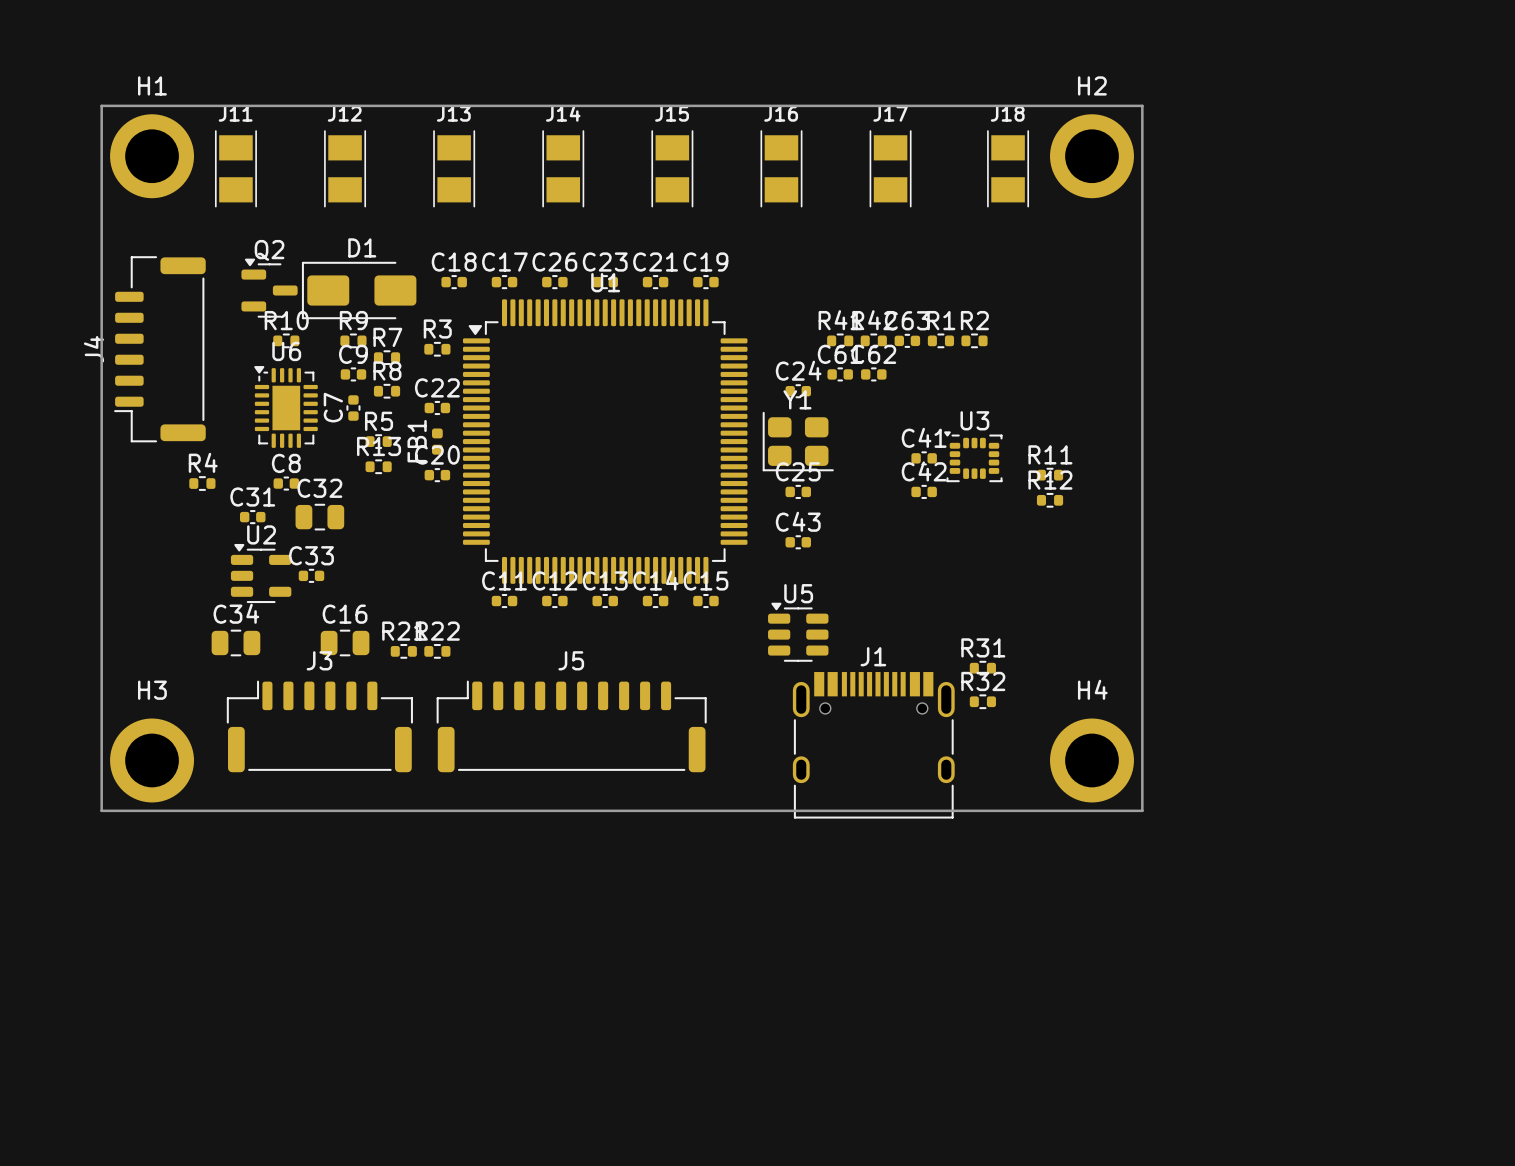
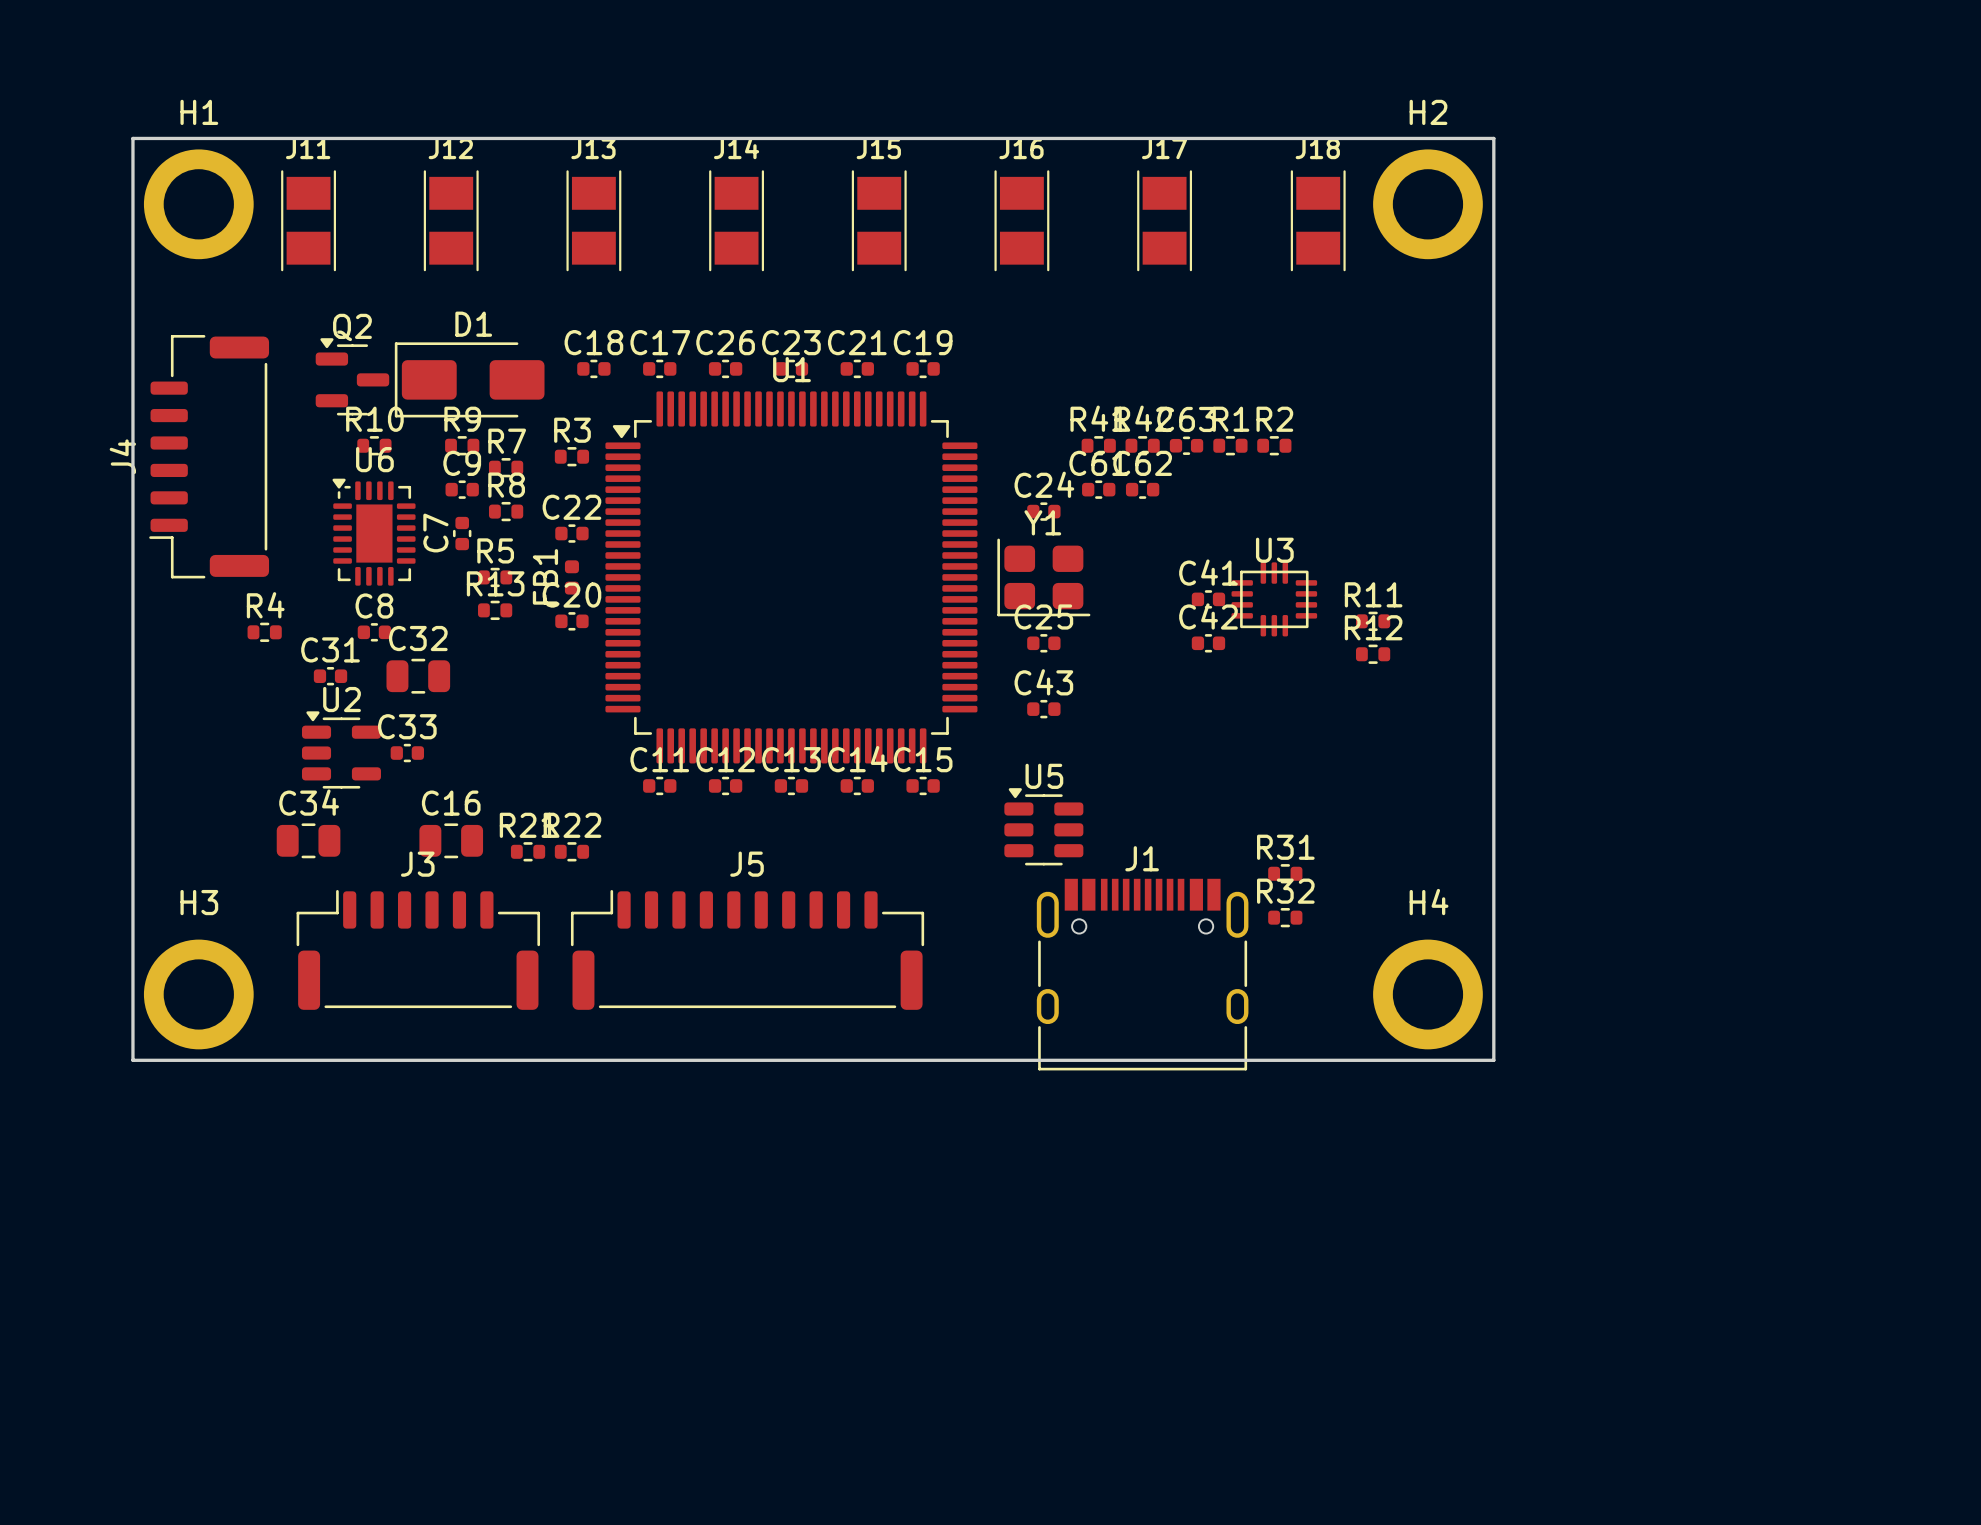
U3 footprint: [944, 431, 1003, 483] -> [1231, 562, 1318, 637]

